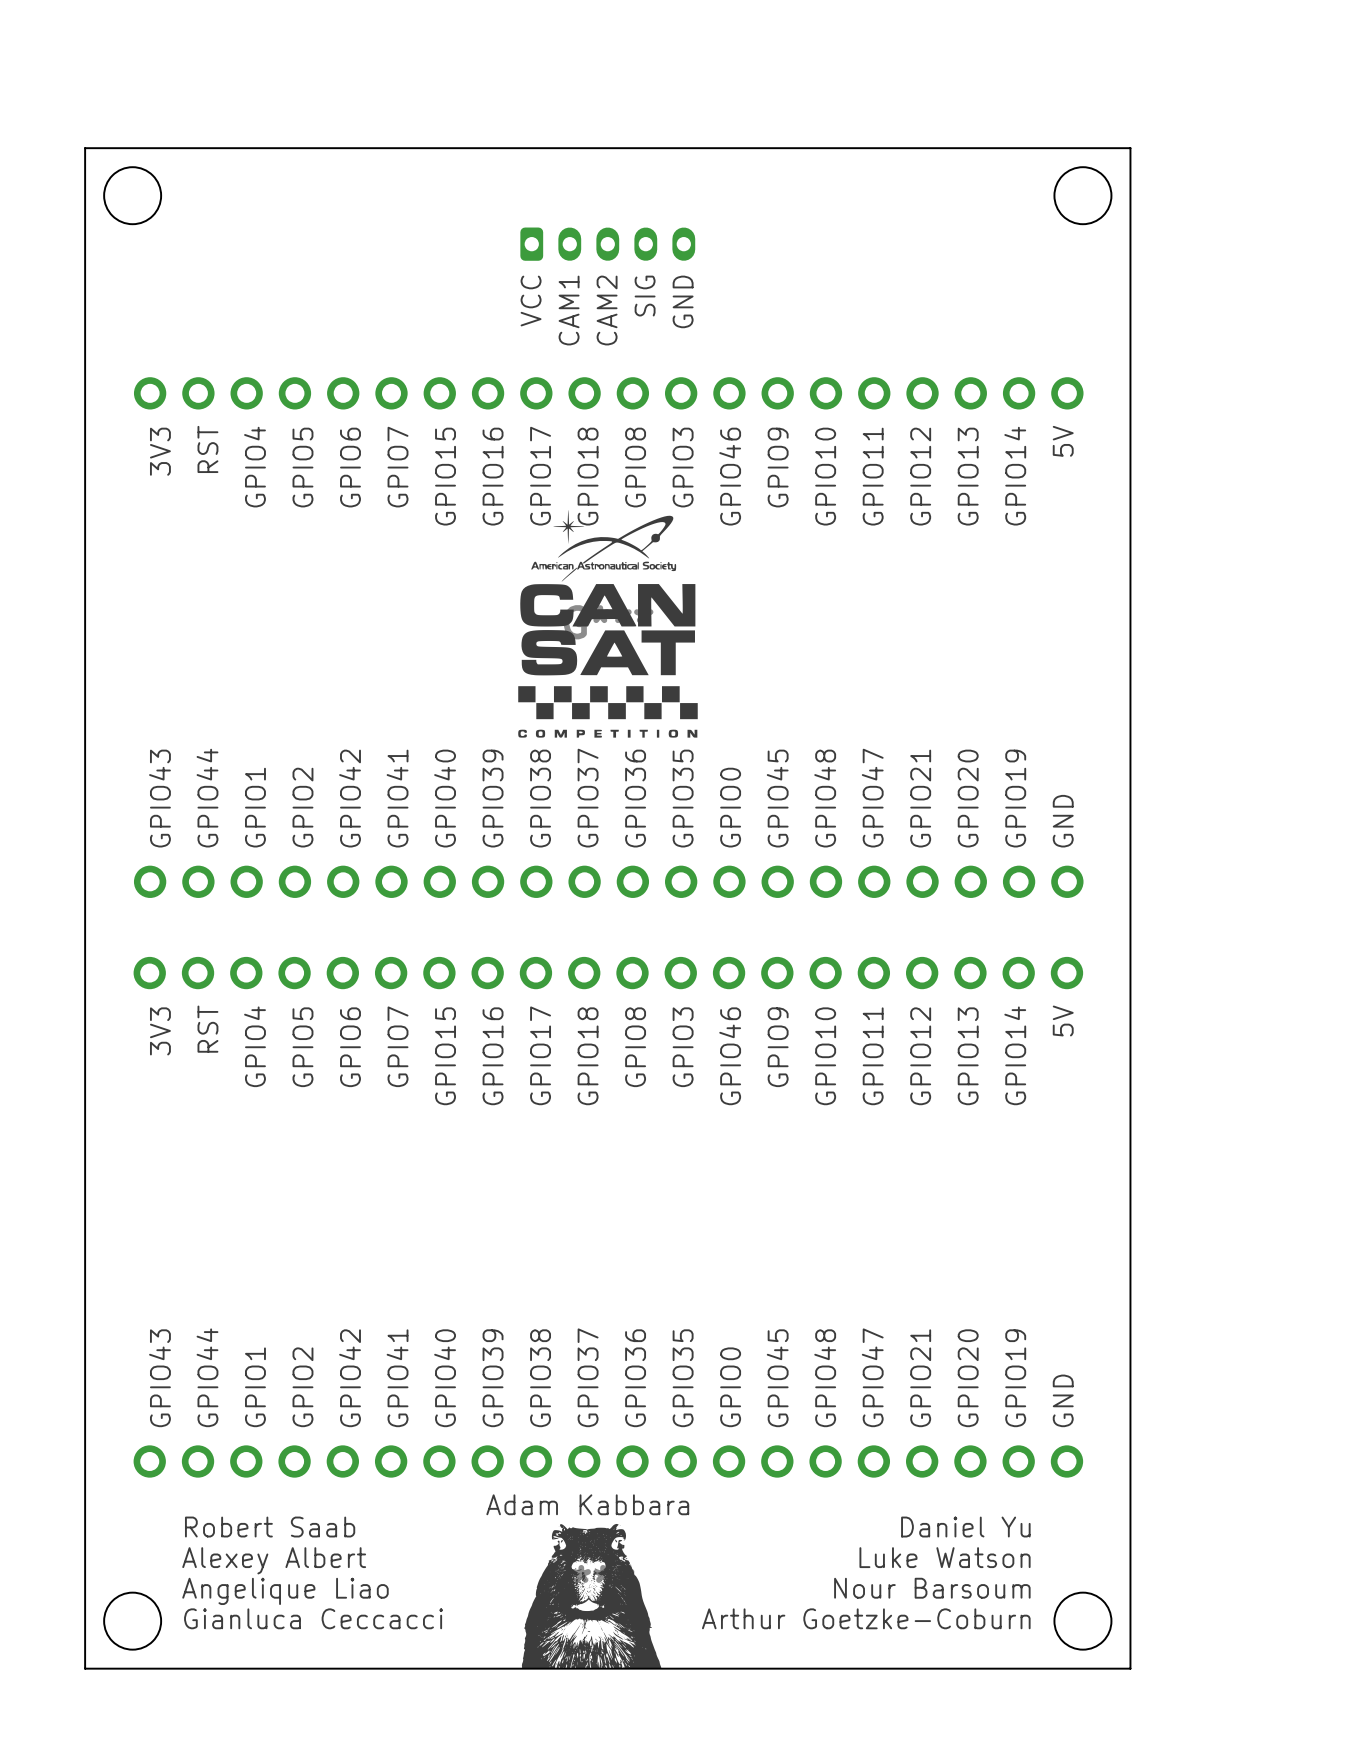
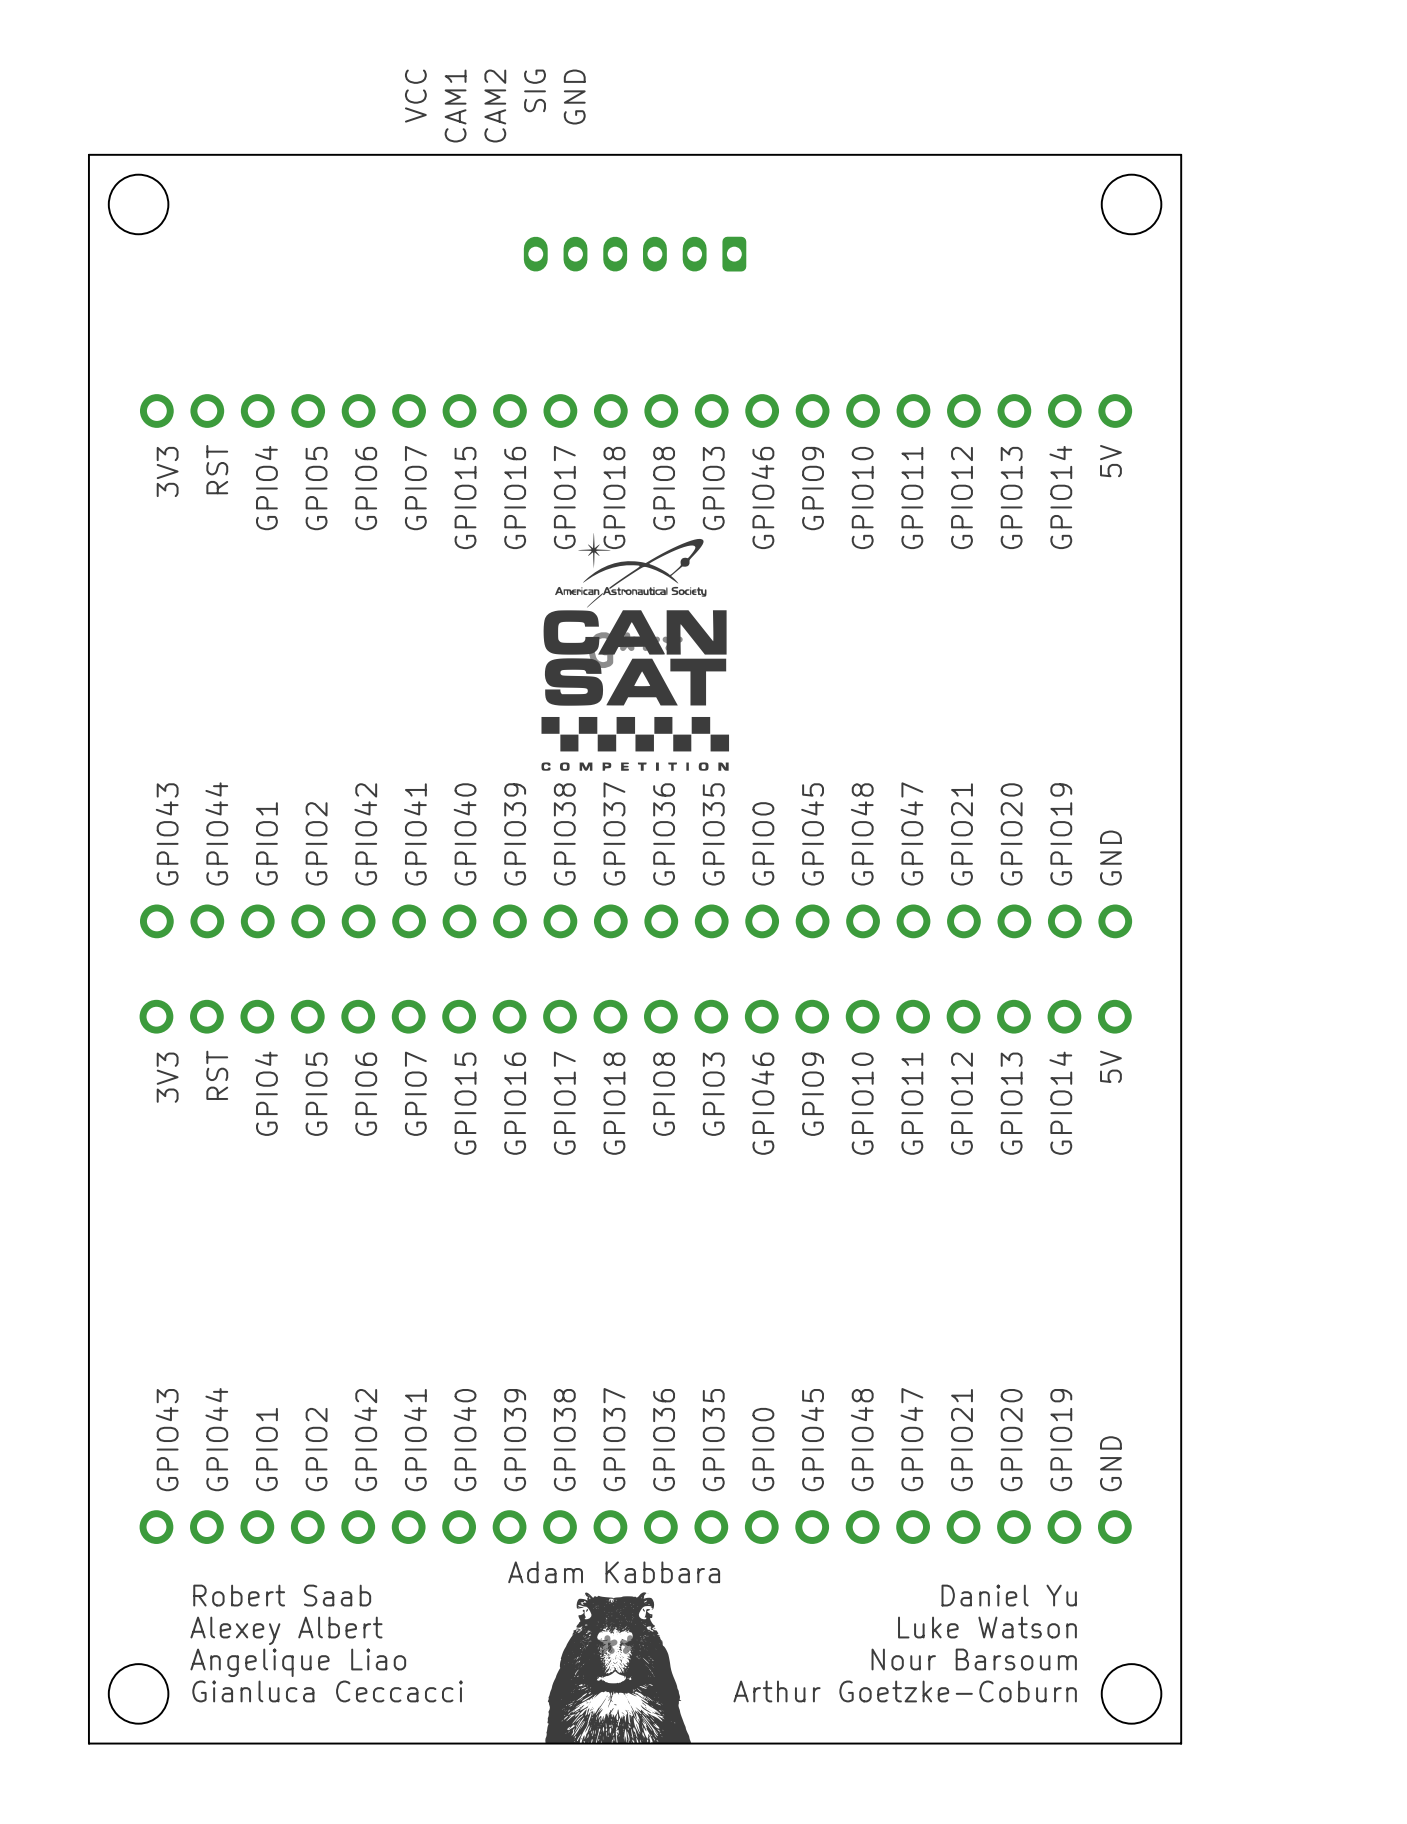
part footprint: [520, 227, 696, 261] -> [523, 236, 747, 272]
text position: SIG (645, 296) -> SIG (535, 90)
text position: VCC (531, 301) -> VCC (415, 96)
text position: GND (683, 301) -> GND (574, 97)
text position: CAM1 (569, 310) -> CAM1 (455, 106)
text position: CAM2 (607, 310) -> CAM2 (495, 106)

